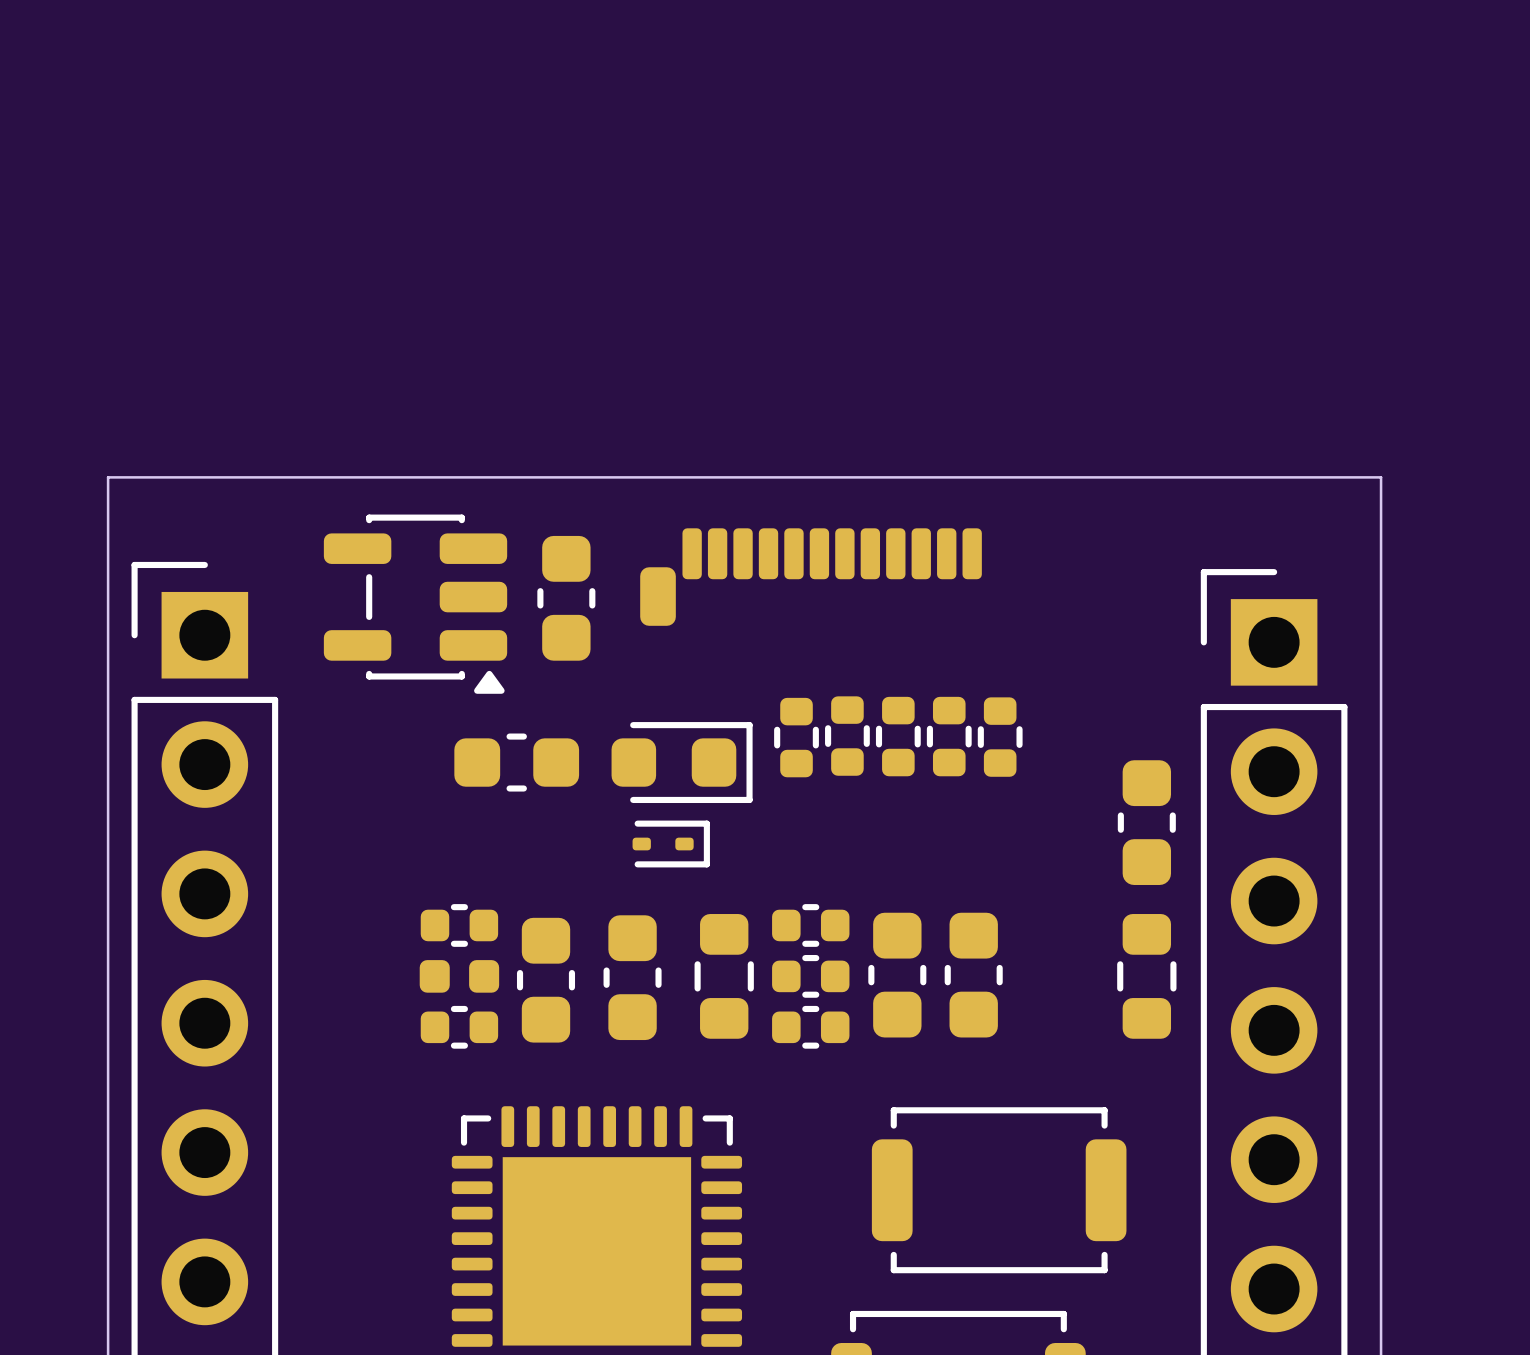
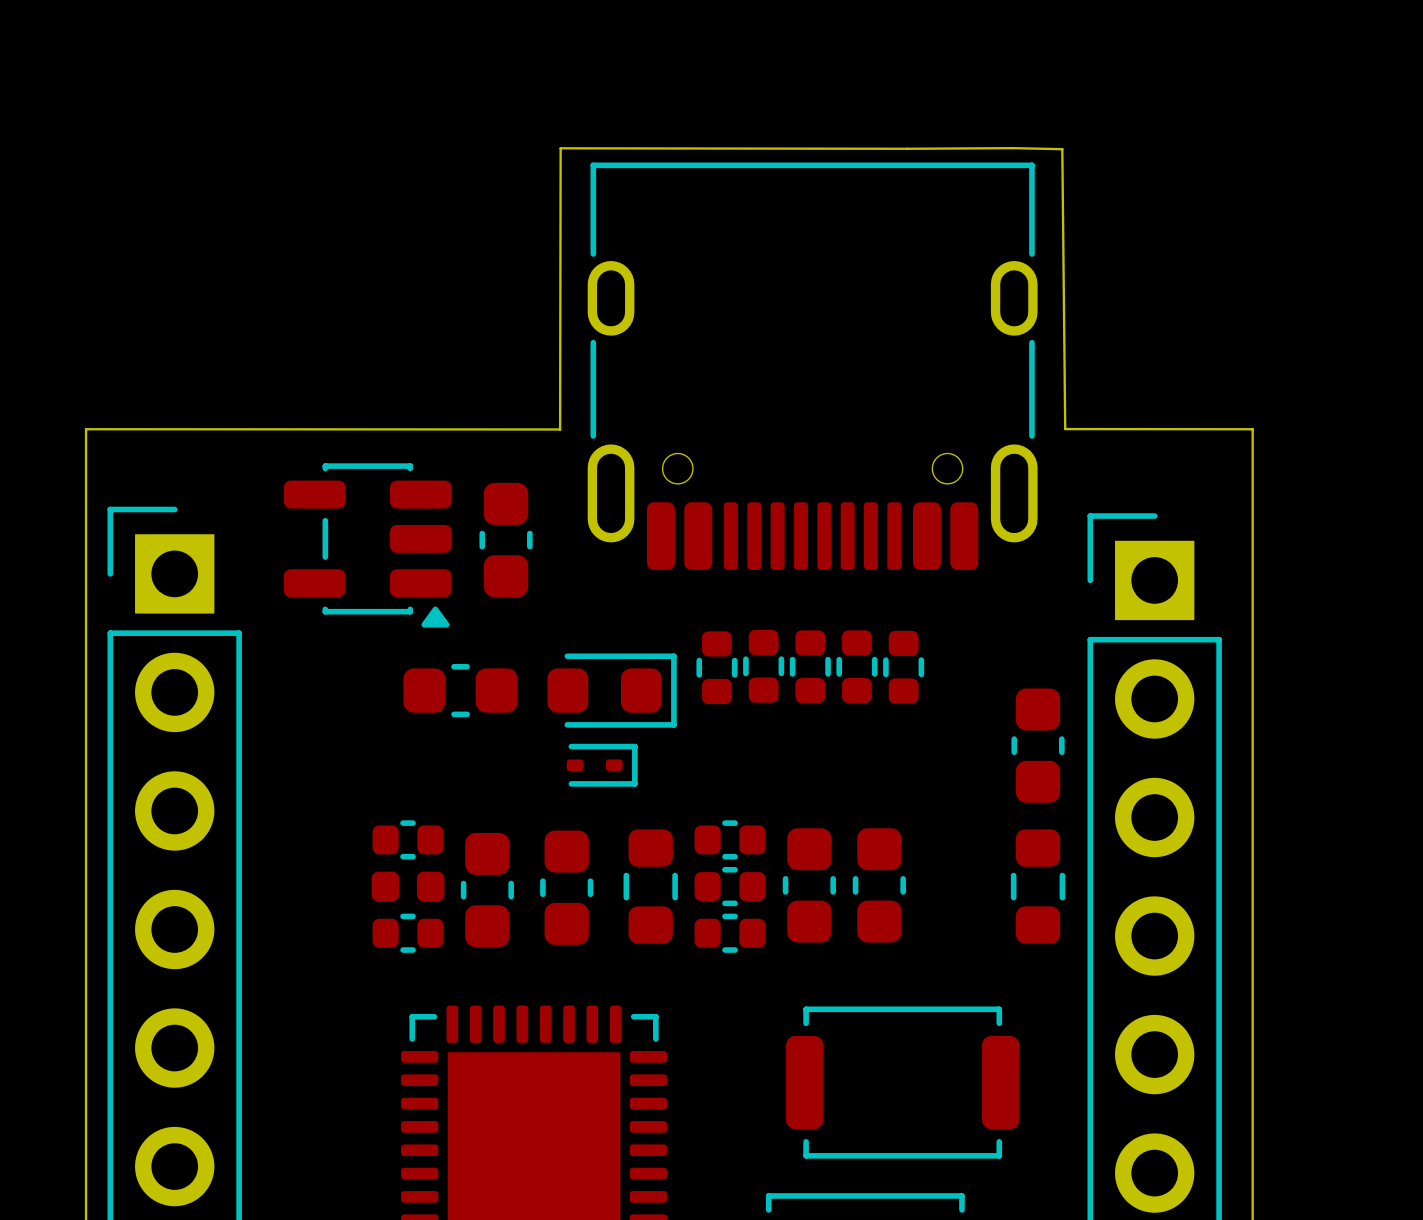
part: none -> (812, 366)
board edge: (108, 477) (1381, 477) -> (86, 429) (560, 429) (560, 148) (1012, 148) (1062, 149) (1065, 429) (1252, 429)
part: (811, 577) -> none

